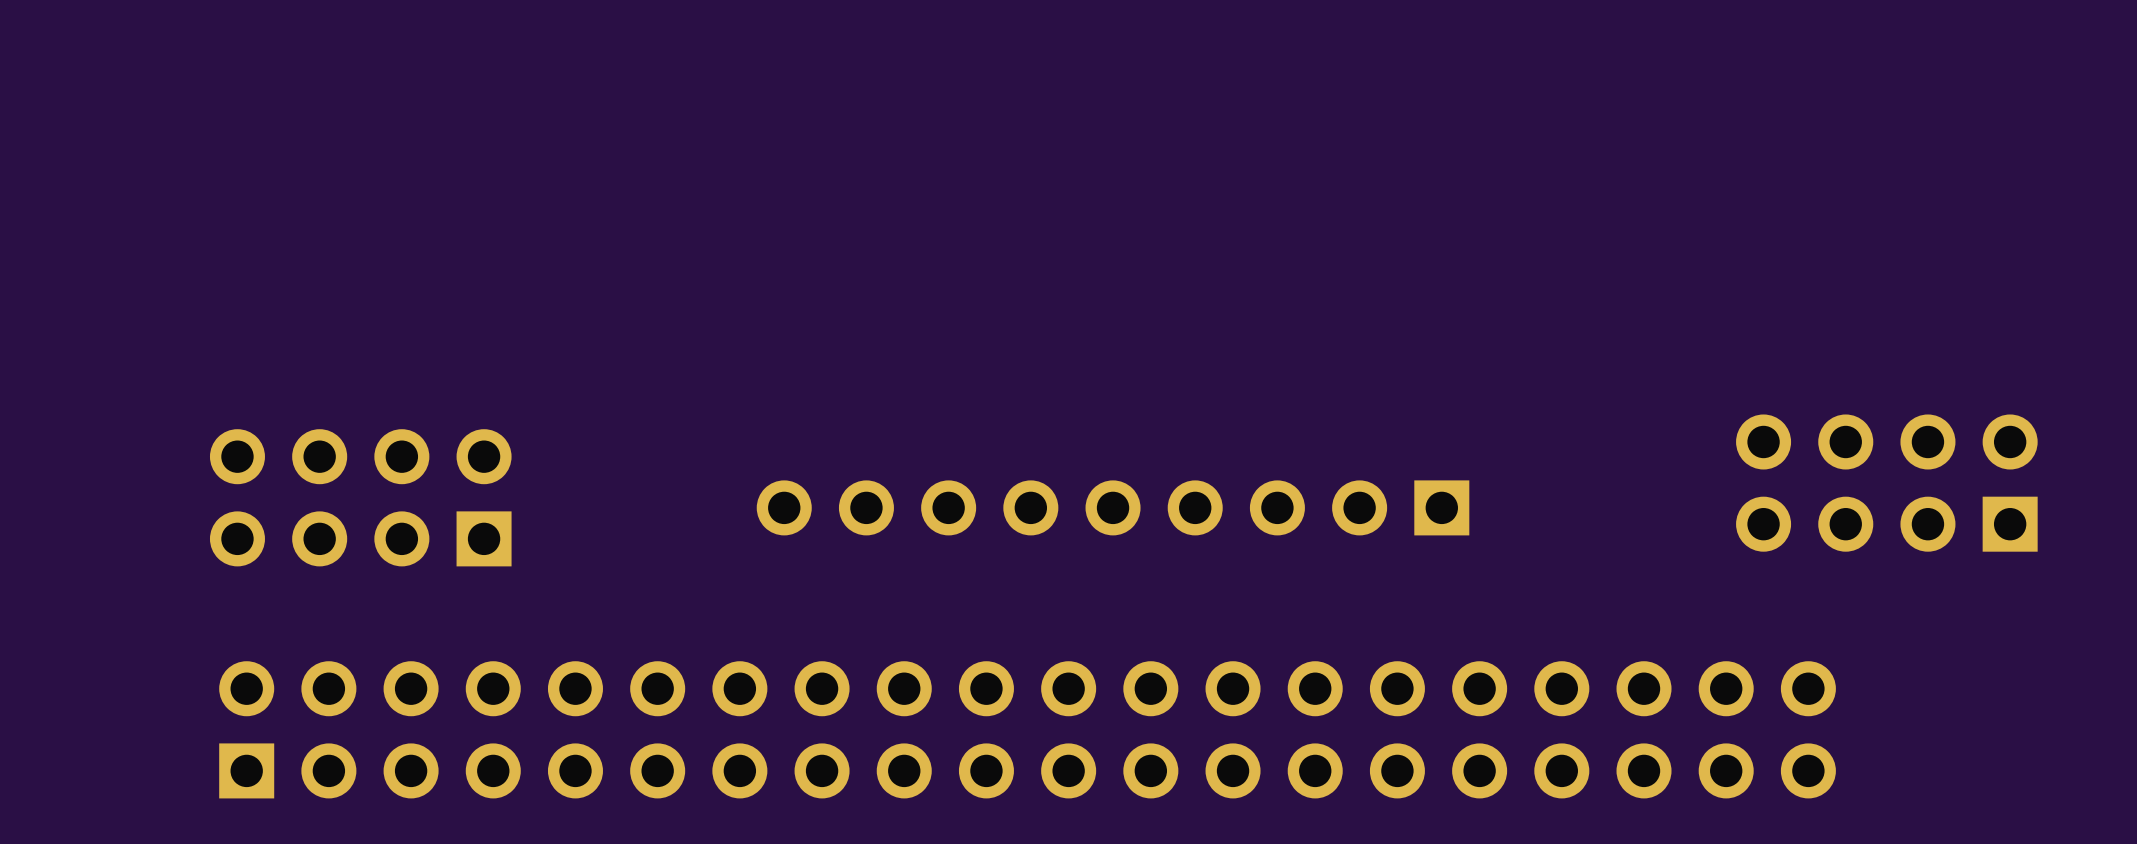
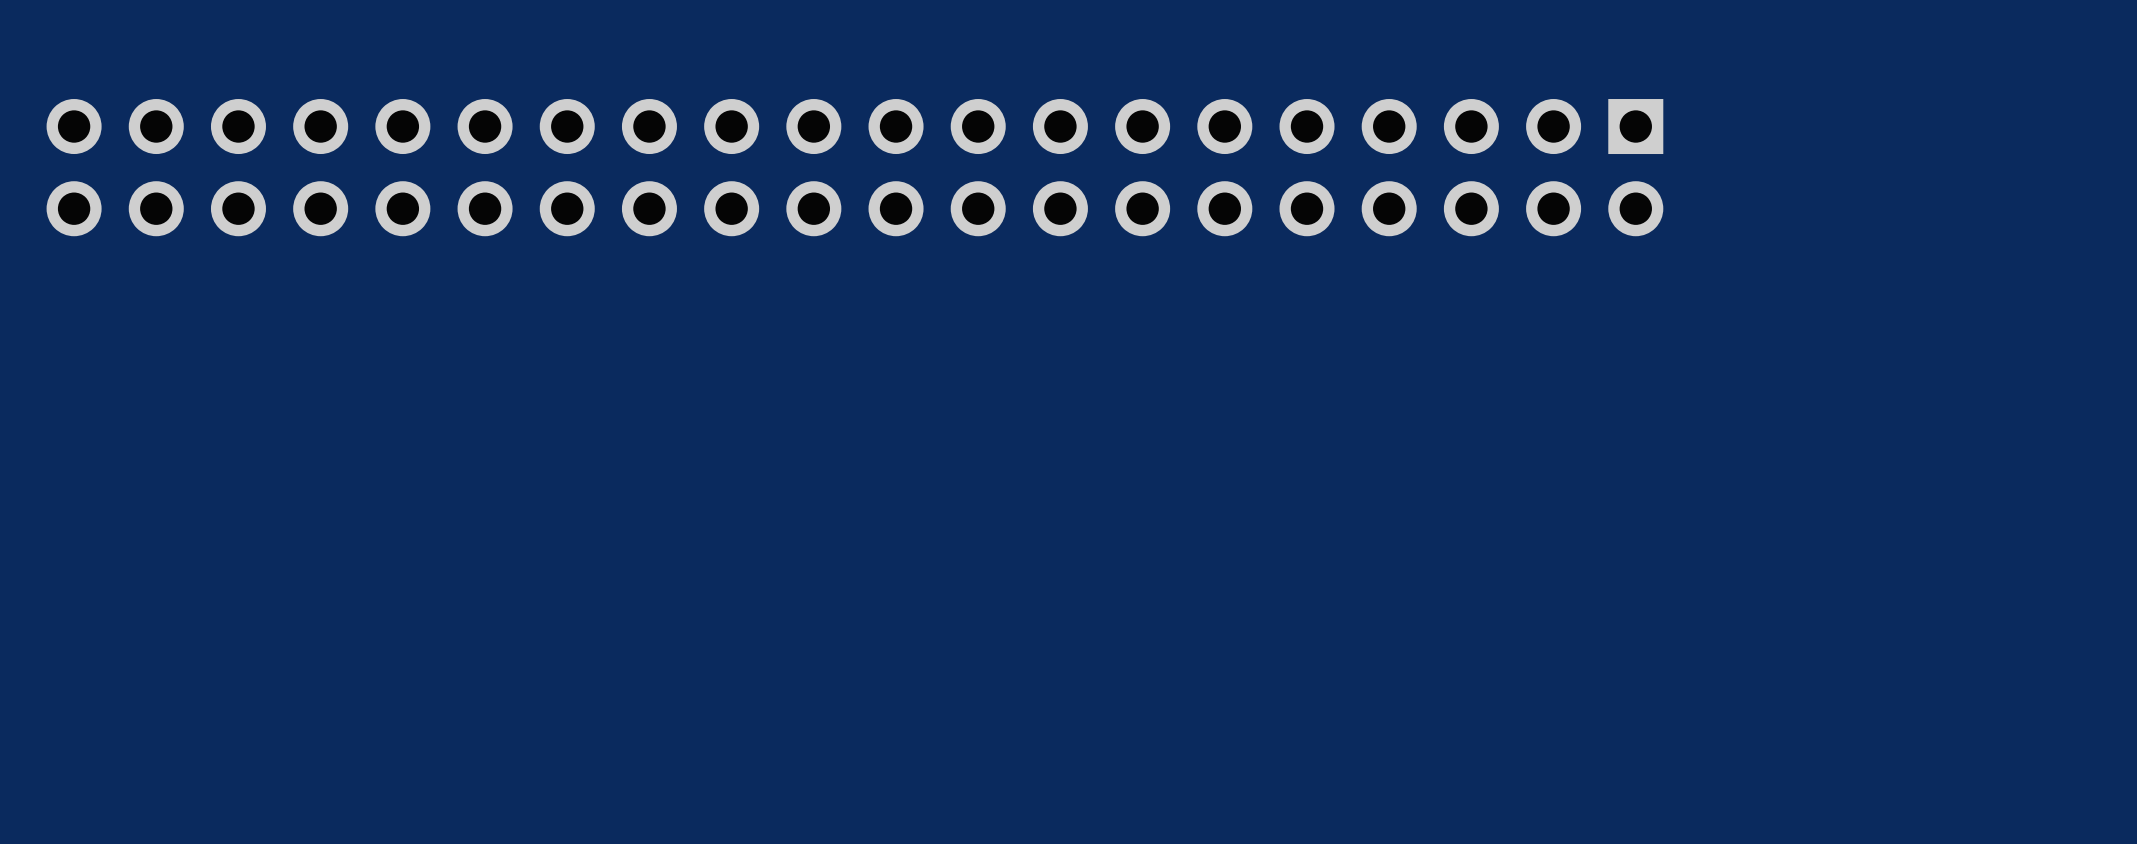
part: (1886, 483) -> none
part: (360, 497) -> none
part: (1113, 507) -> none
part rotation: 0° (1027, 729) -> 180° (854, 167)

